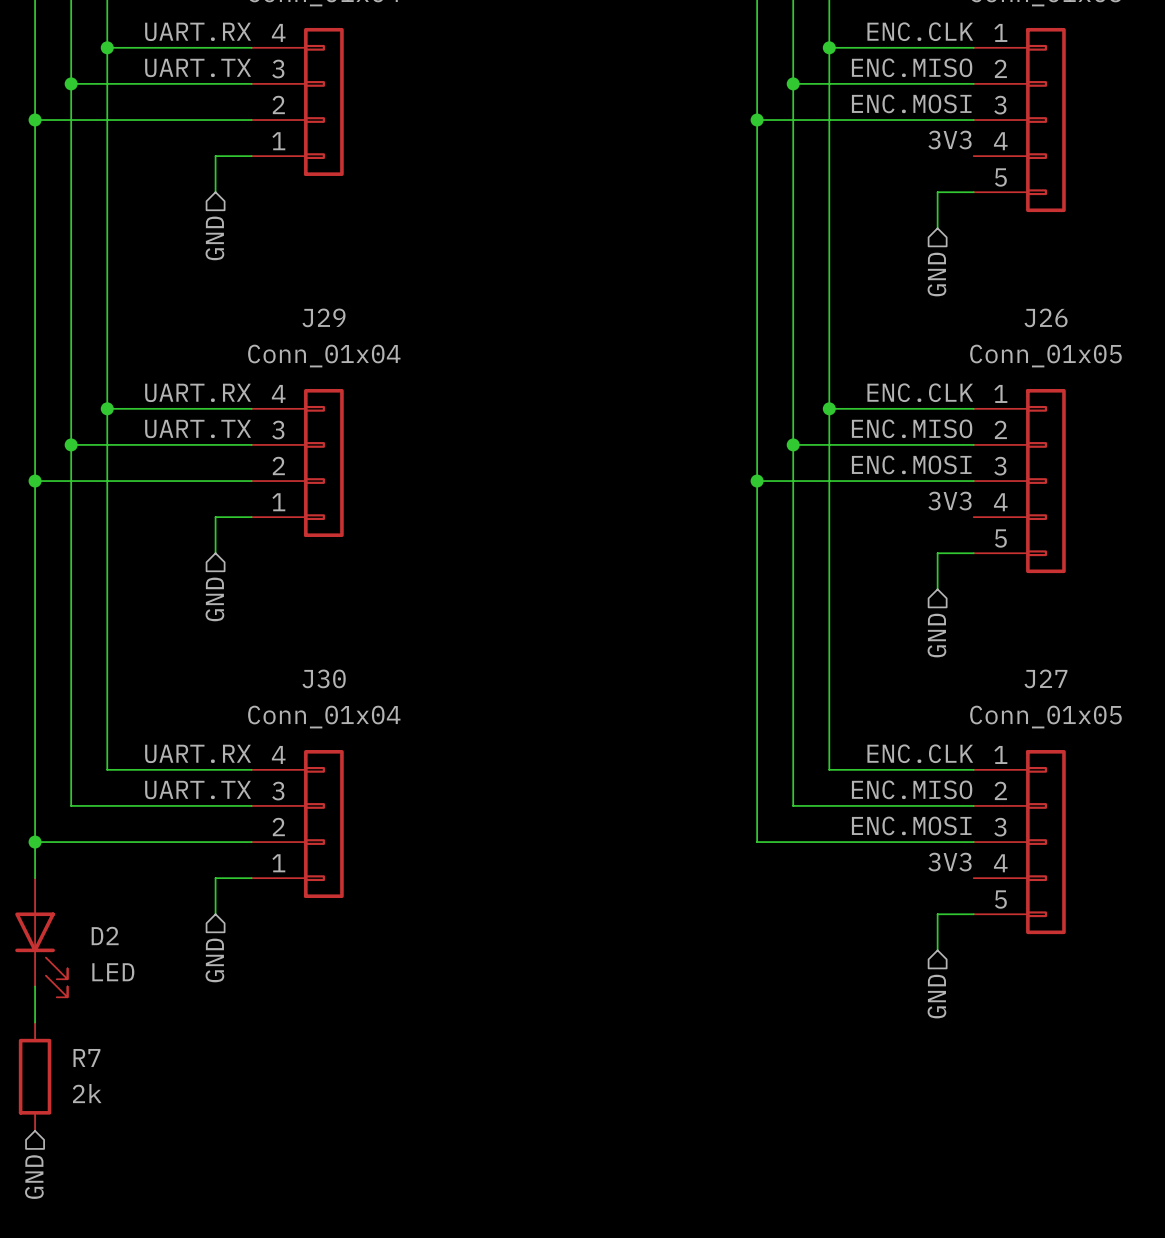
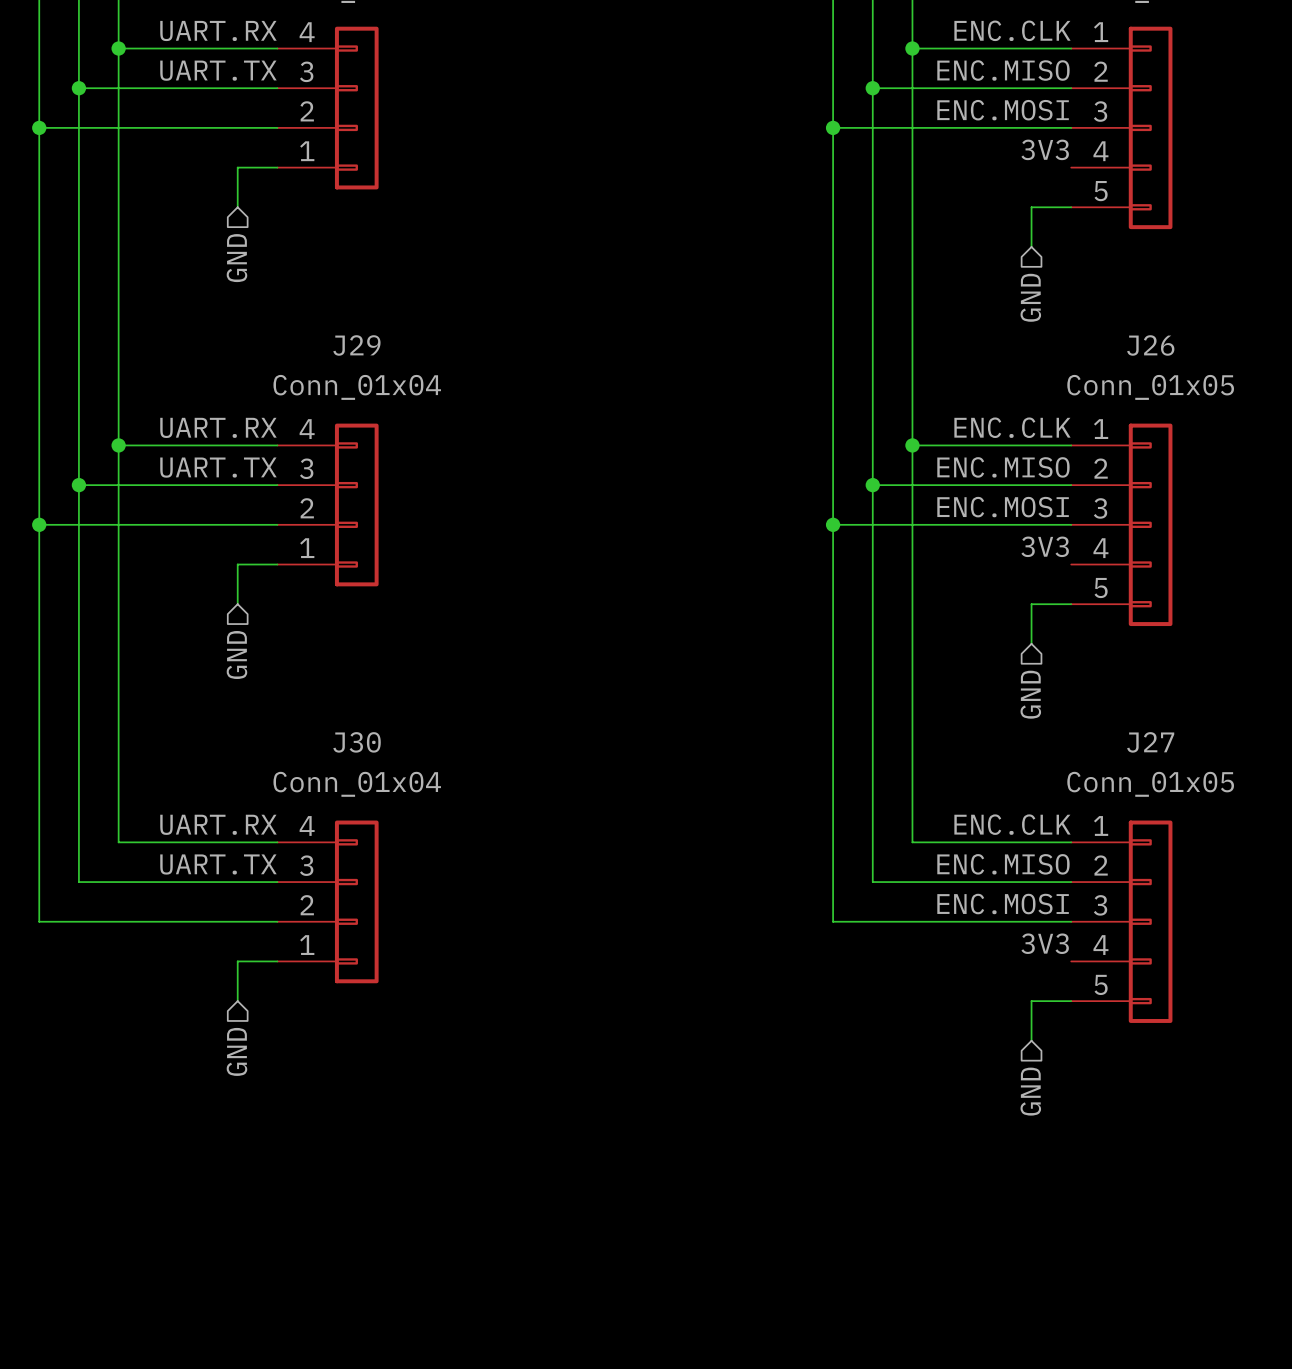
wire: (35, 842) (35, 878) -> none
junction: (35, 842) -> none
D2: LED (41, 937) -> none
wire: (35, 986) (35, 1022) -> none
R7: 2k (35, 1076) -> none
hierarchical label: GND (34, 1177) -> none

